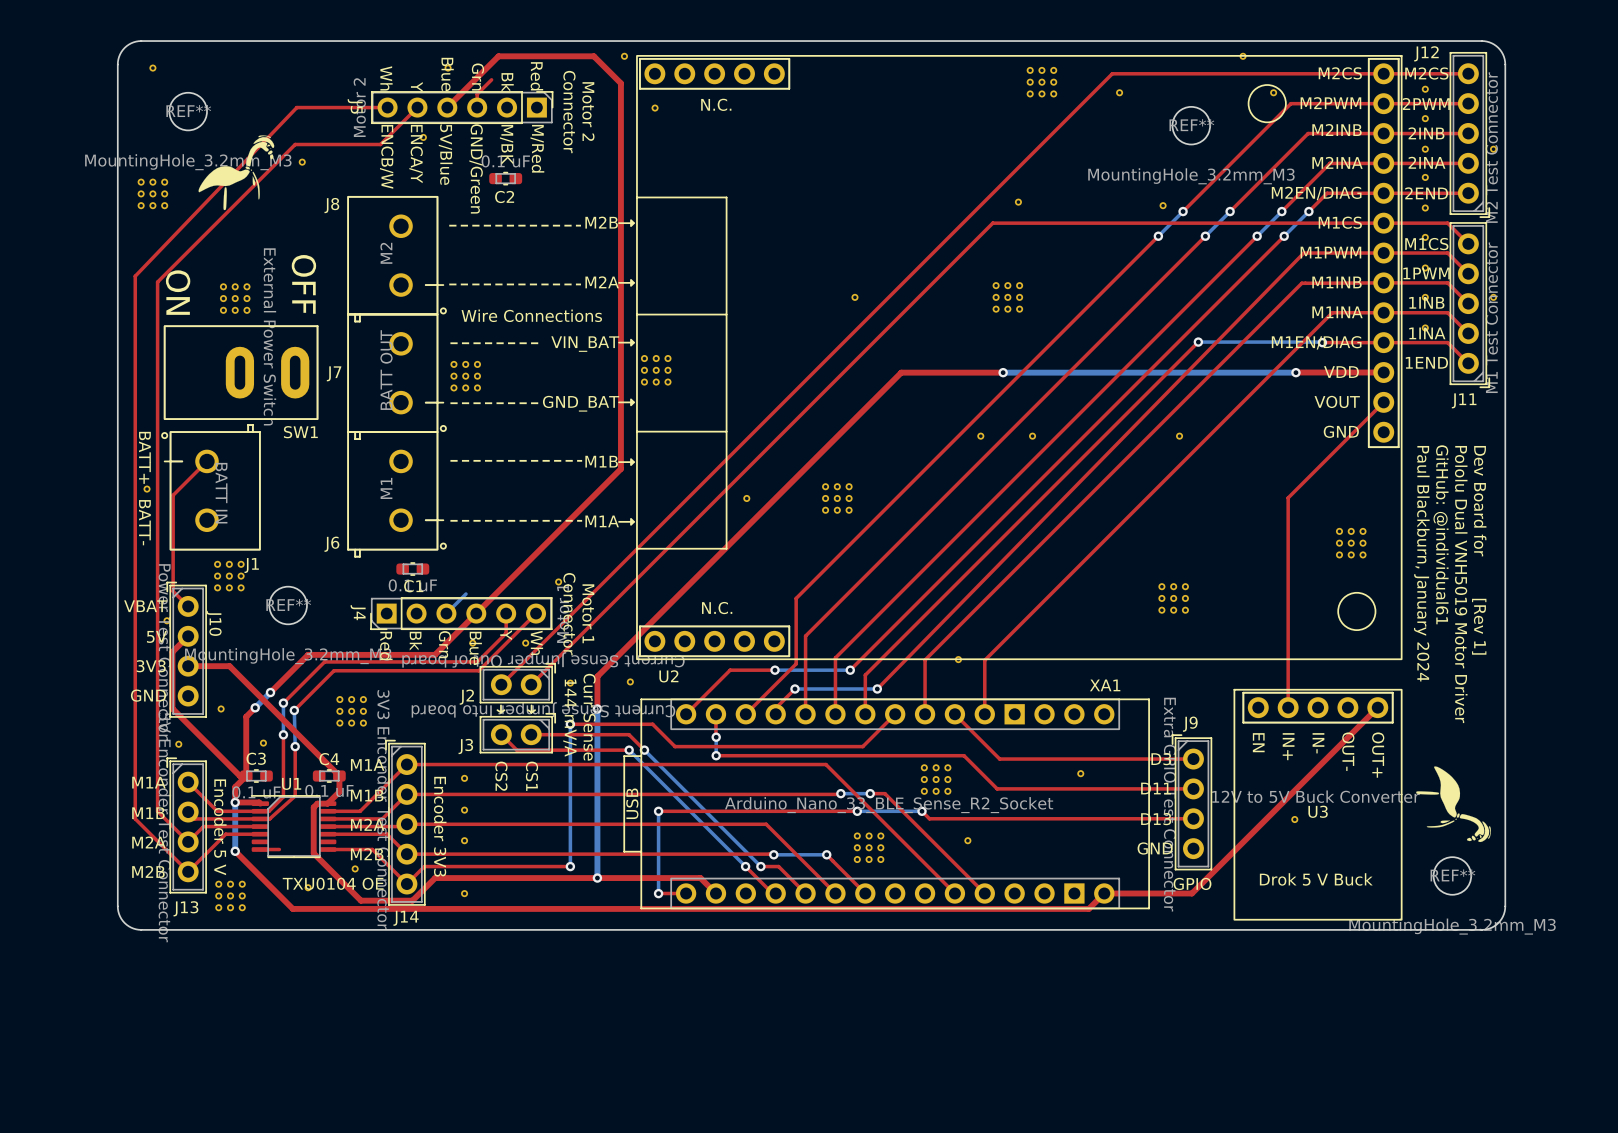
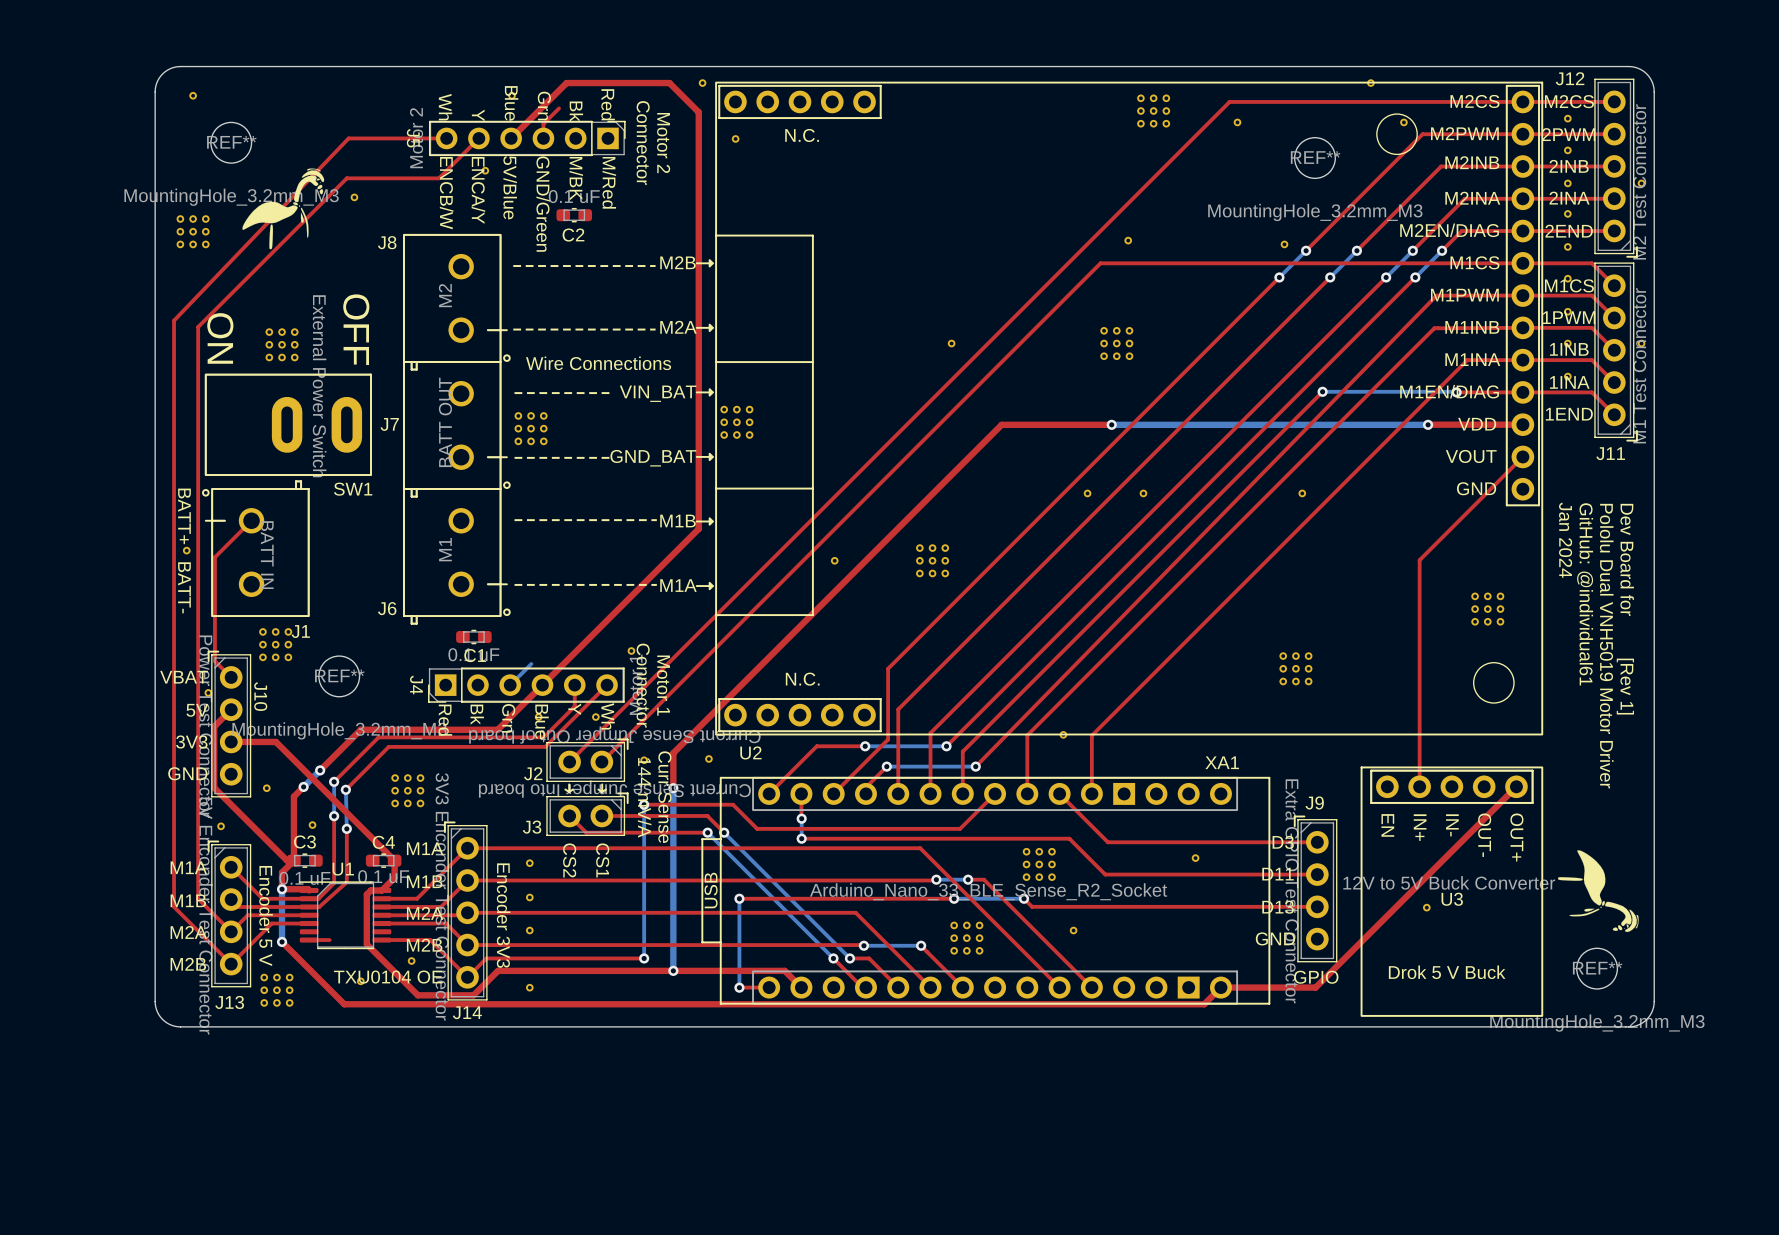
text: Paul Blackburn, January 2024 (1421, 563) -> Jan 2024 (1565, 540)

